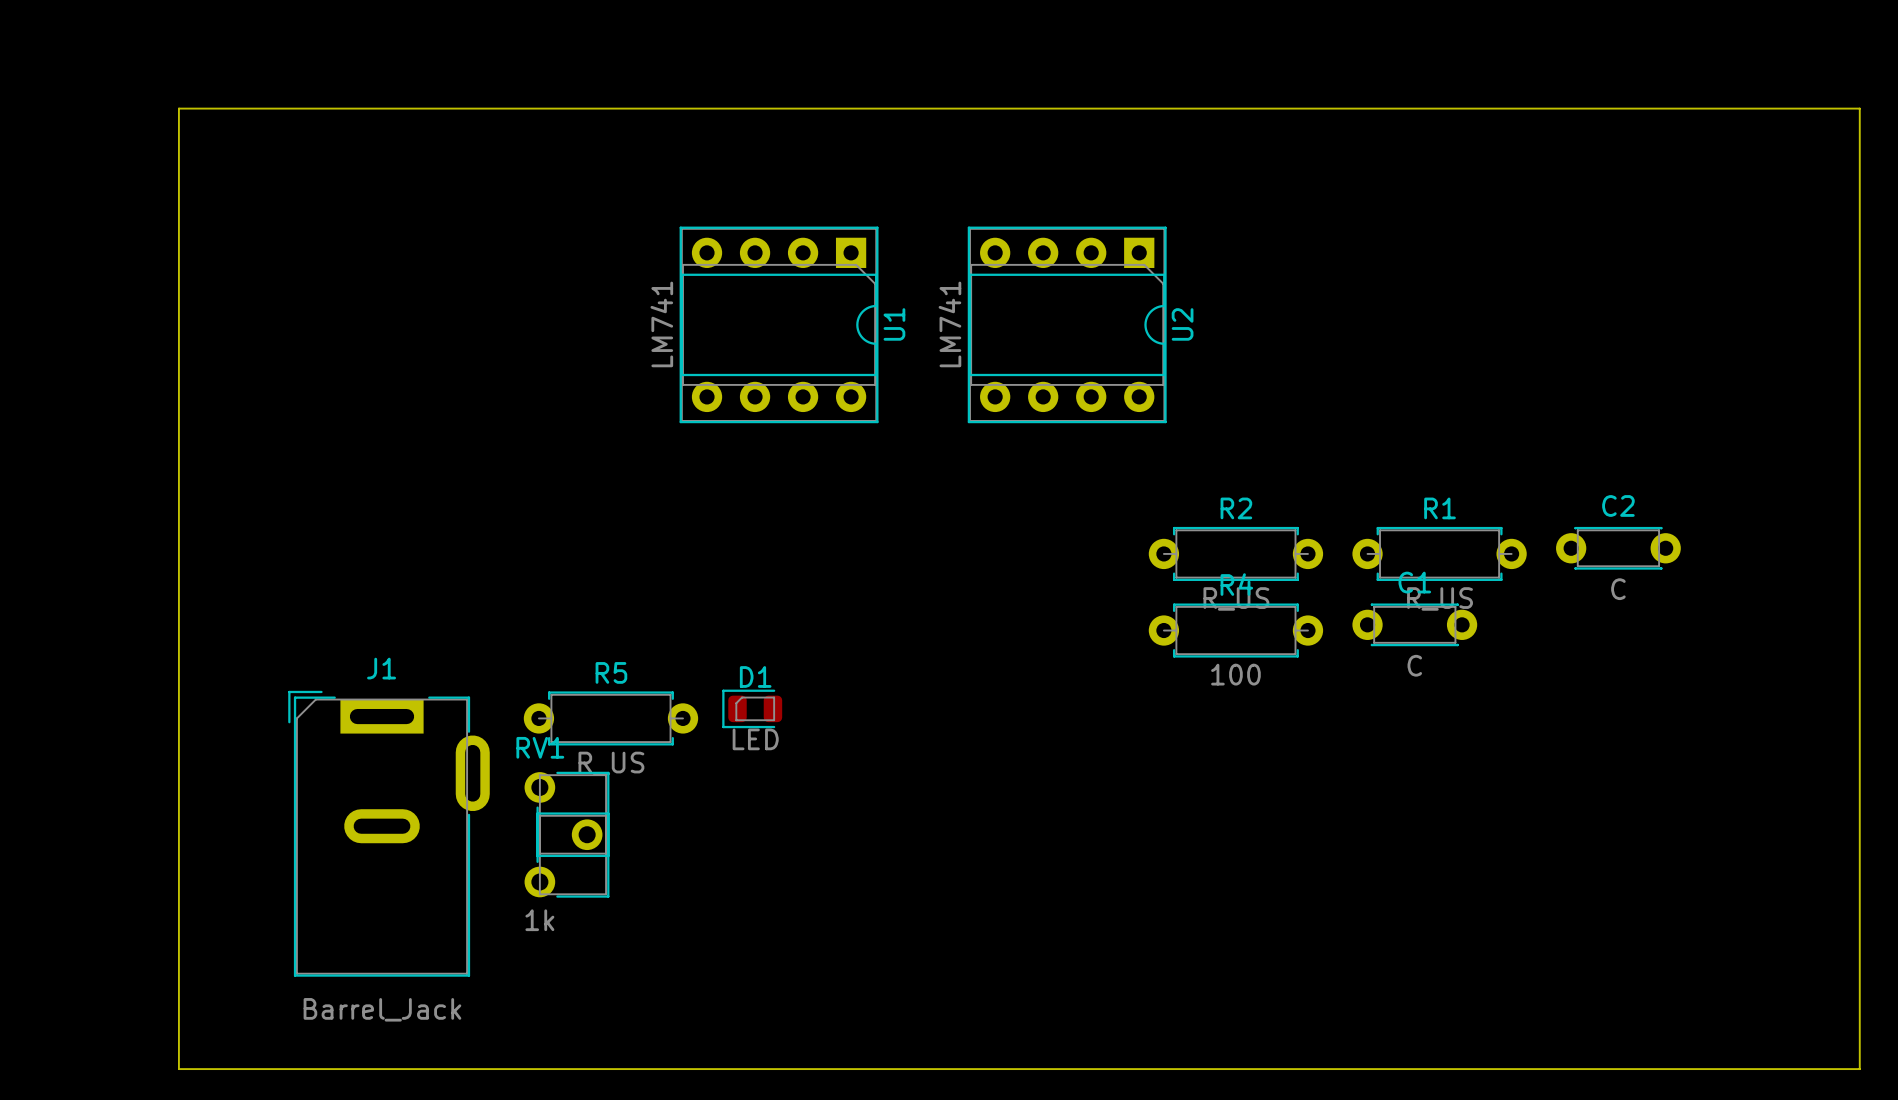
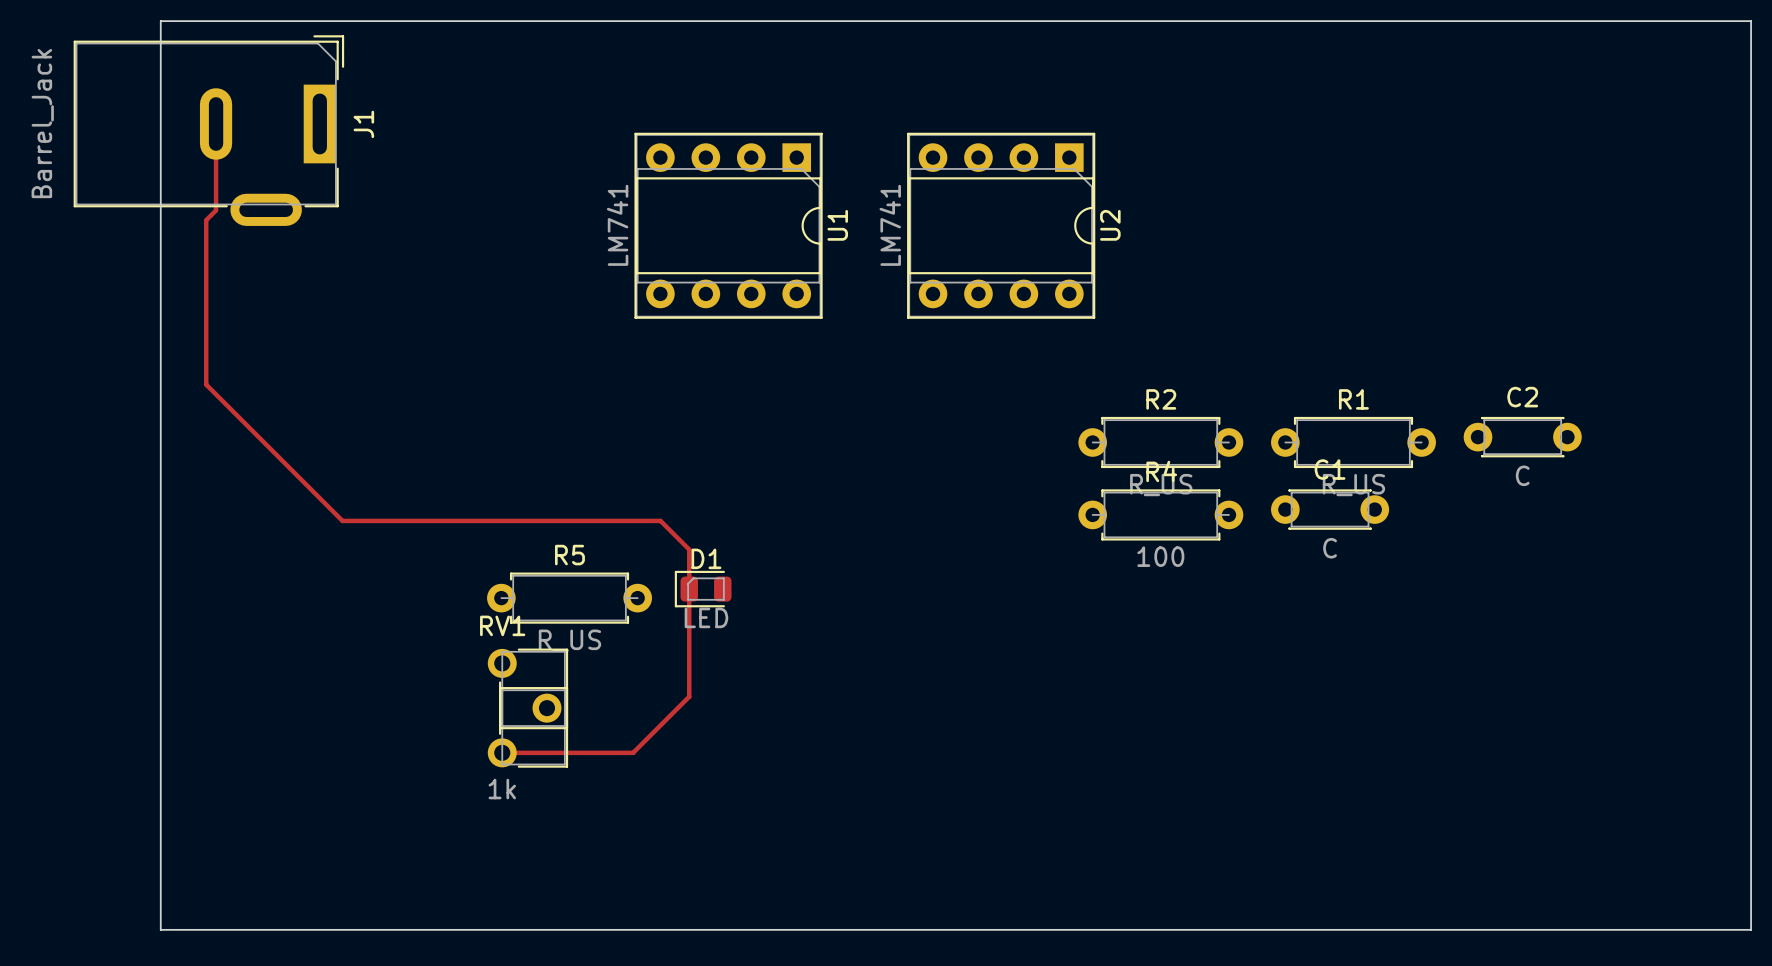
top track: none -> (216, 123) (216, 210) (206, 220) (206, 384) (342, 520) (660, 520) (689, 549) (689, 696) (633, 752) (502, 752)
J1 rotation: 0° (389, 833) -> 90° clockwise (208, 130)
J1 position: (389, 833) -> (208, 130)

